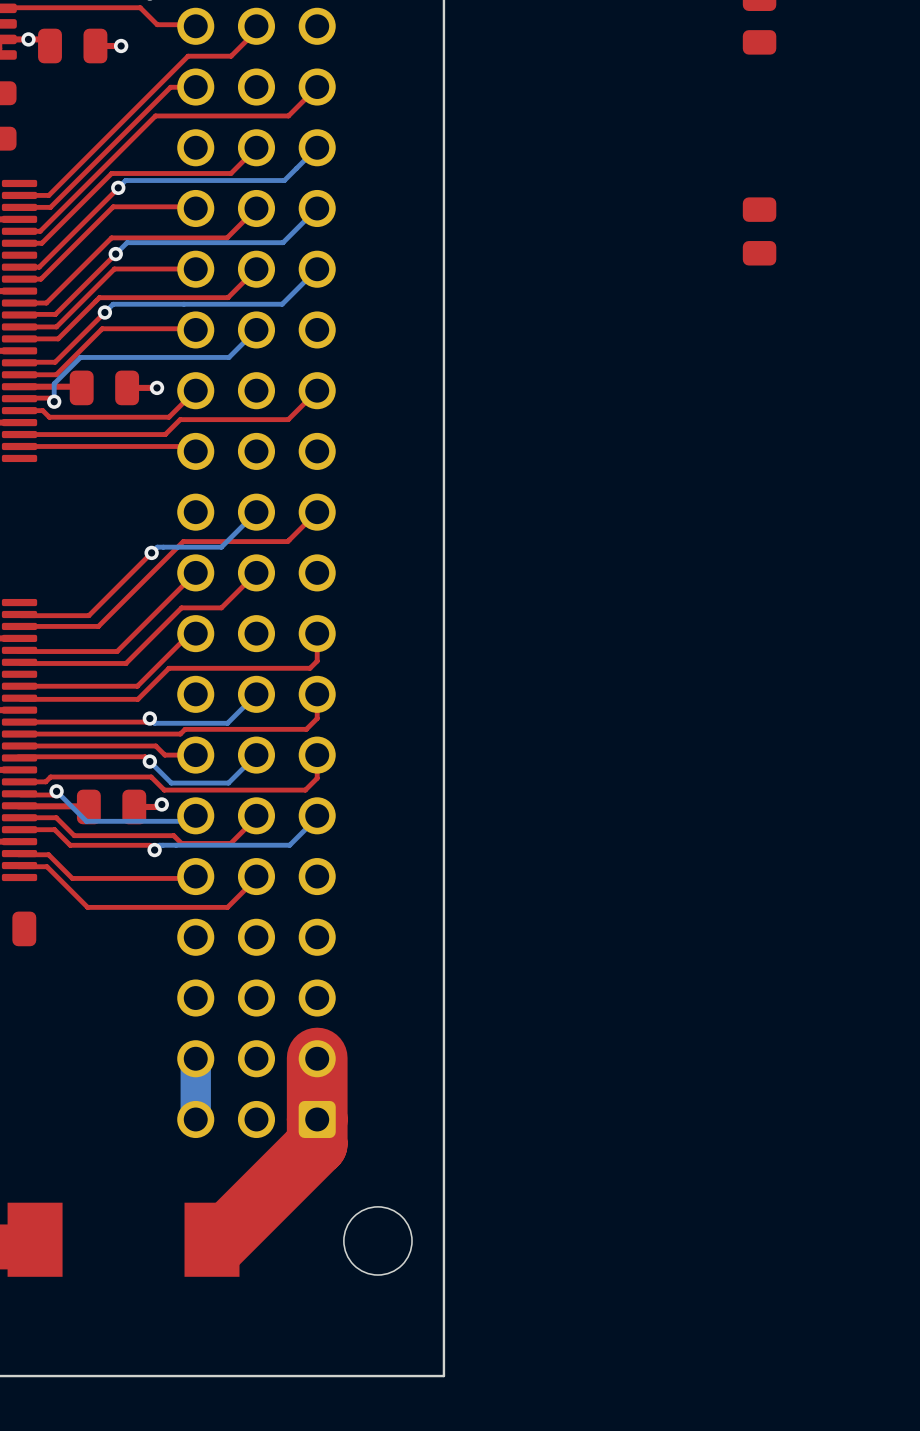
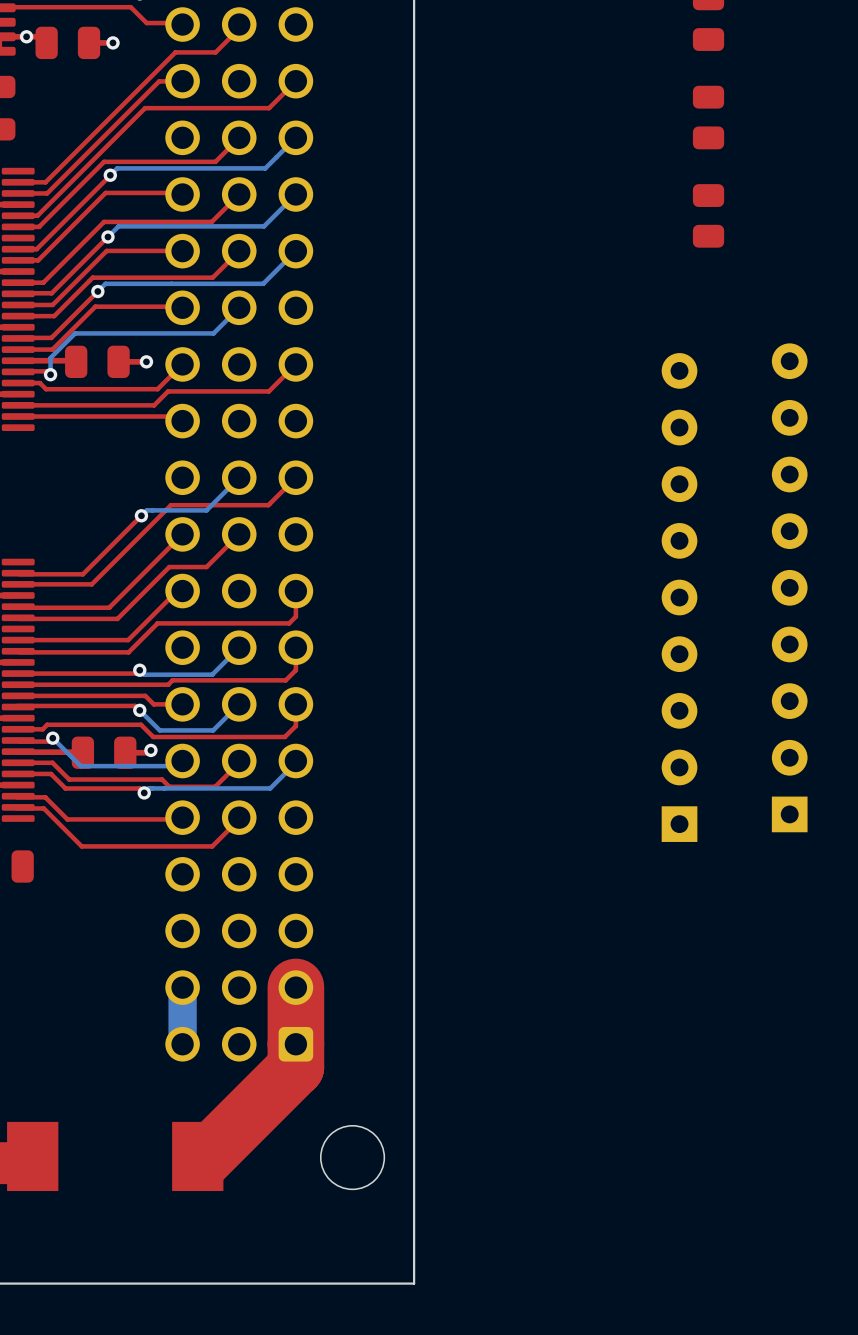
part: none -> (708, 117)
part: none -> (789, 587)
part: none -> (679, 597)

